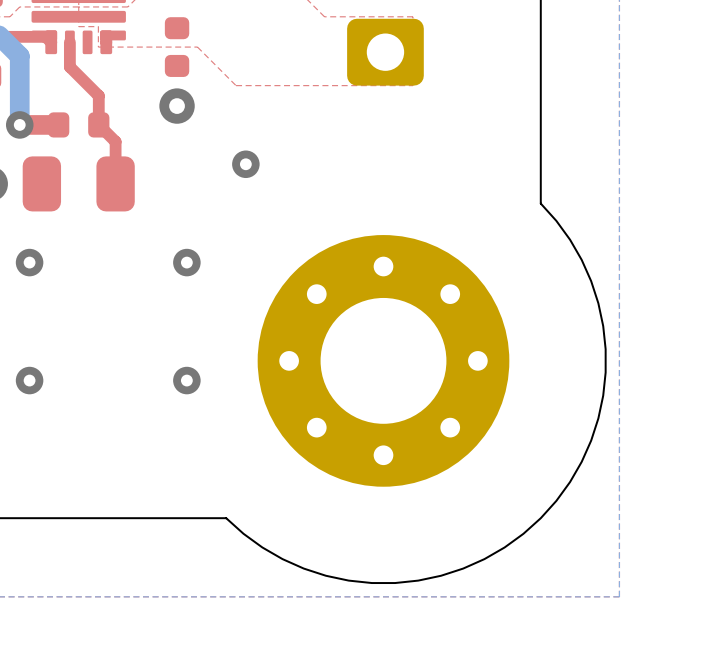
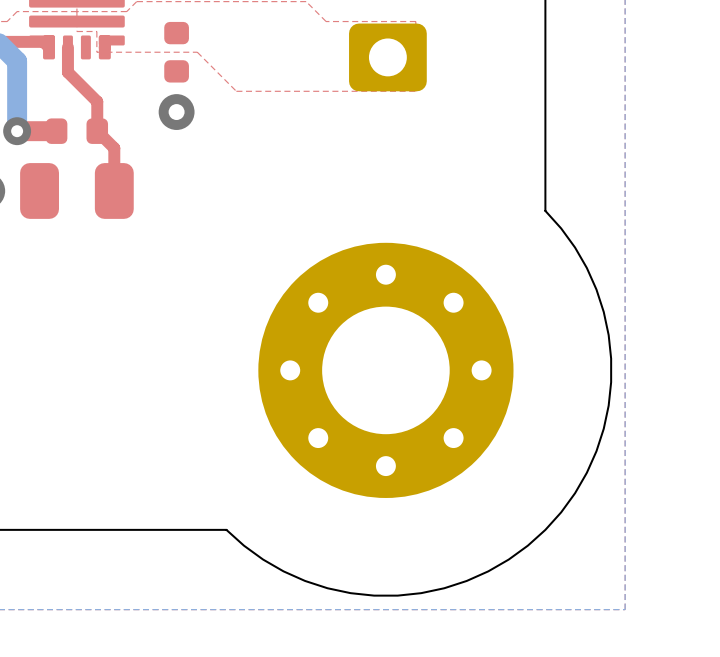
via: (245, 164) -> none
via: (29, 262) -> none
via: (186, 262) -> none
via: (29, 380) -> none
via: (186, 380) -> none

